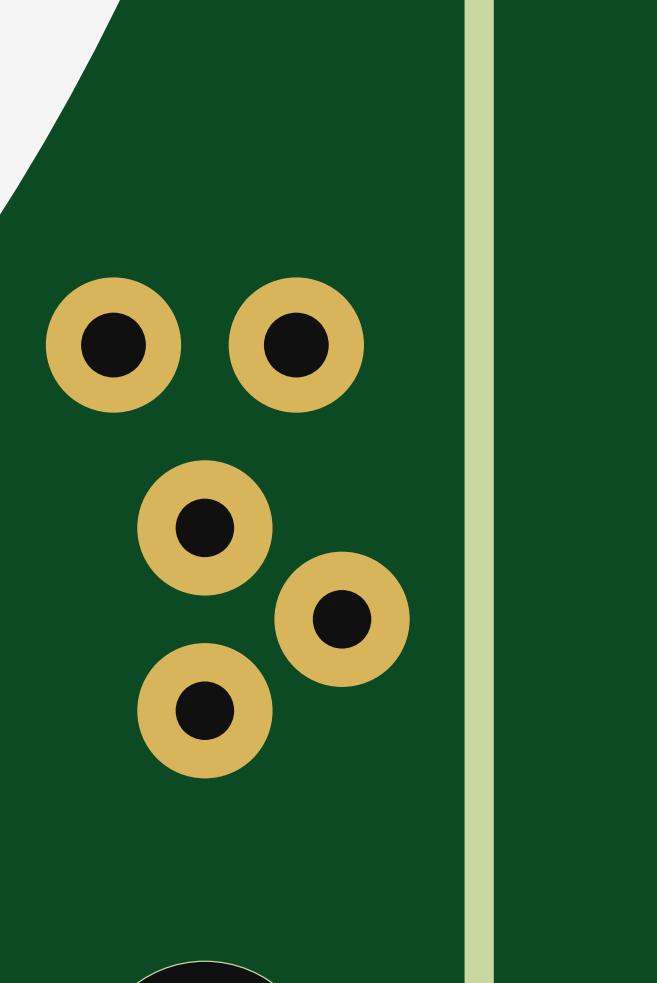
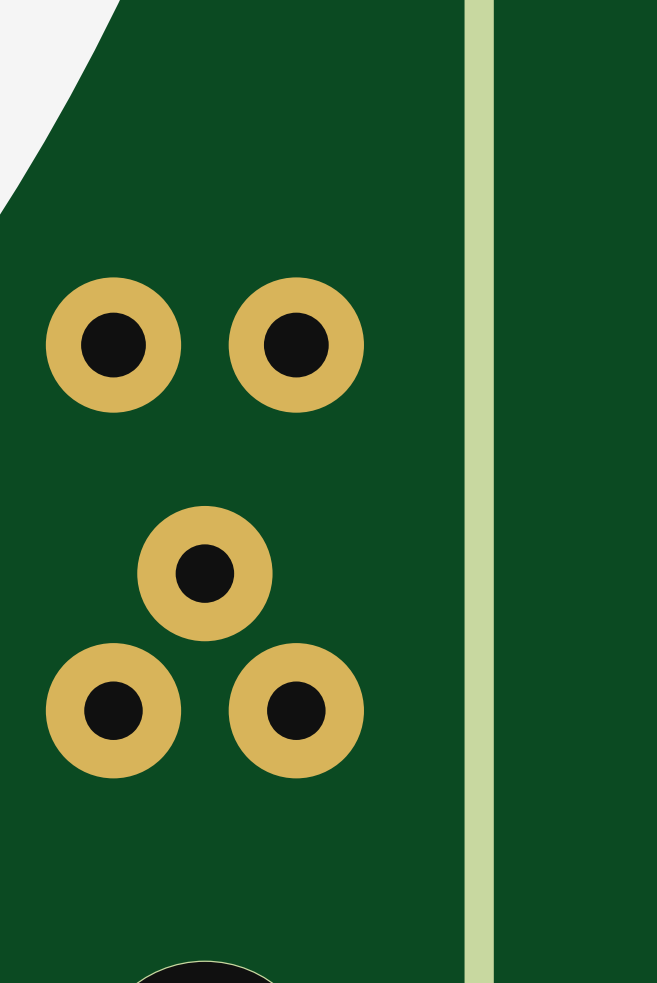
part rotation: 0° (273, 619) -> 90° counterclockwise (204, 642)

